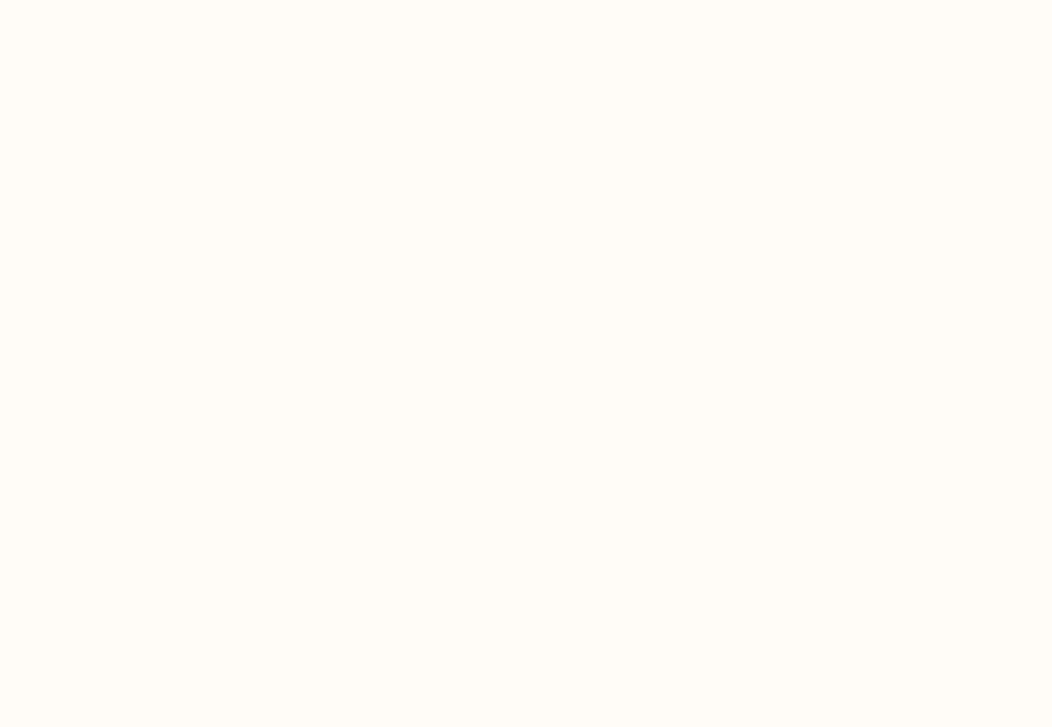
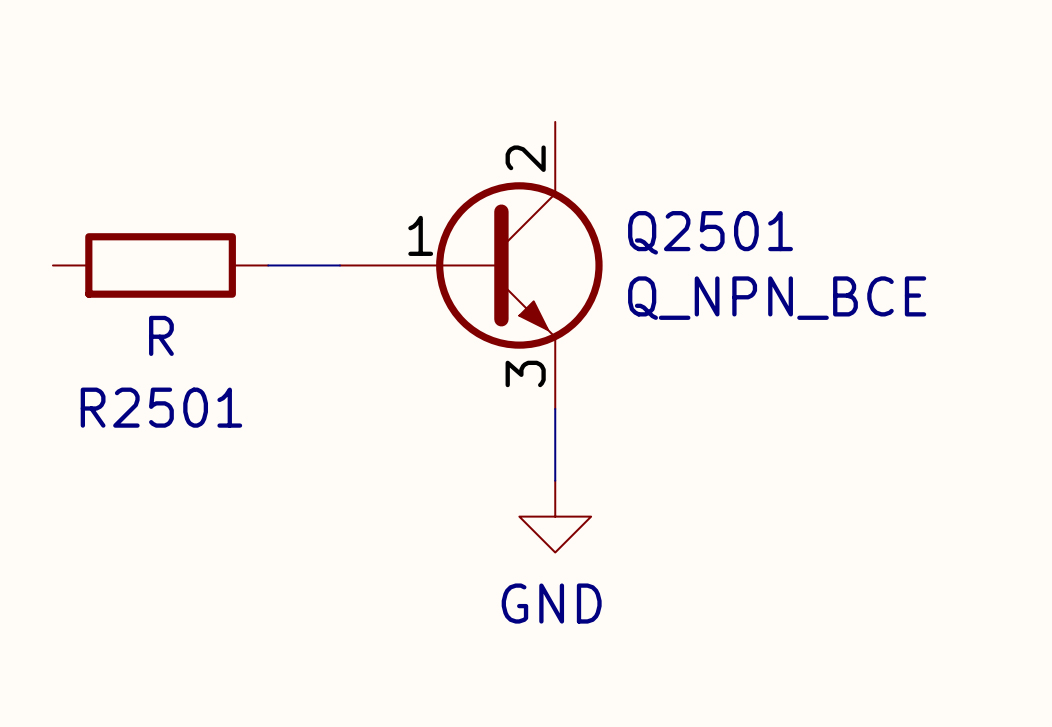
R2501: none -> R (160, 265)
wire: none -> (268, 265) (339, 265)
Q2501: none -> Q_NPN_BCE (471, 265)
wire: none -> (555, 408) (555, 480)
power symbol: none -> GND (555, 516)

